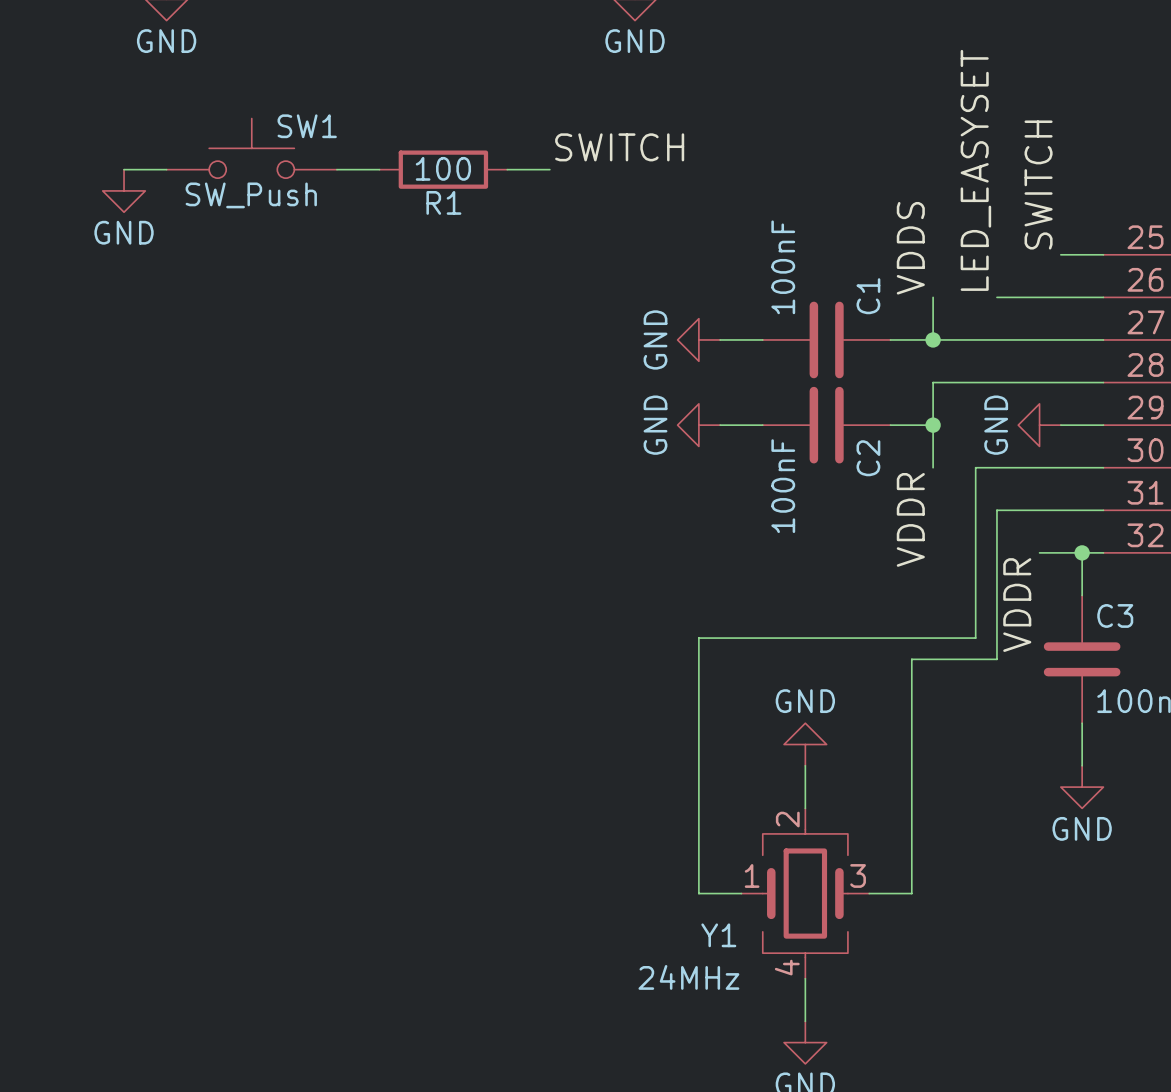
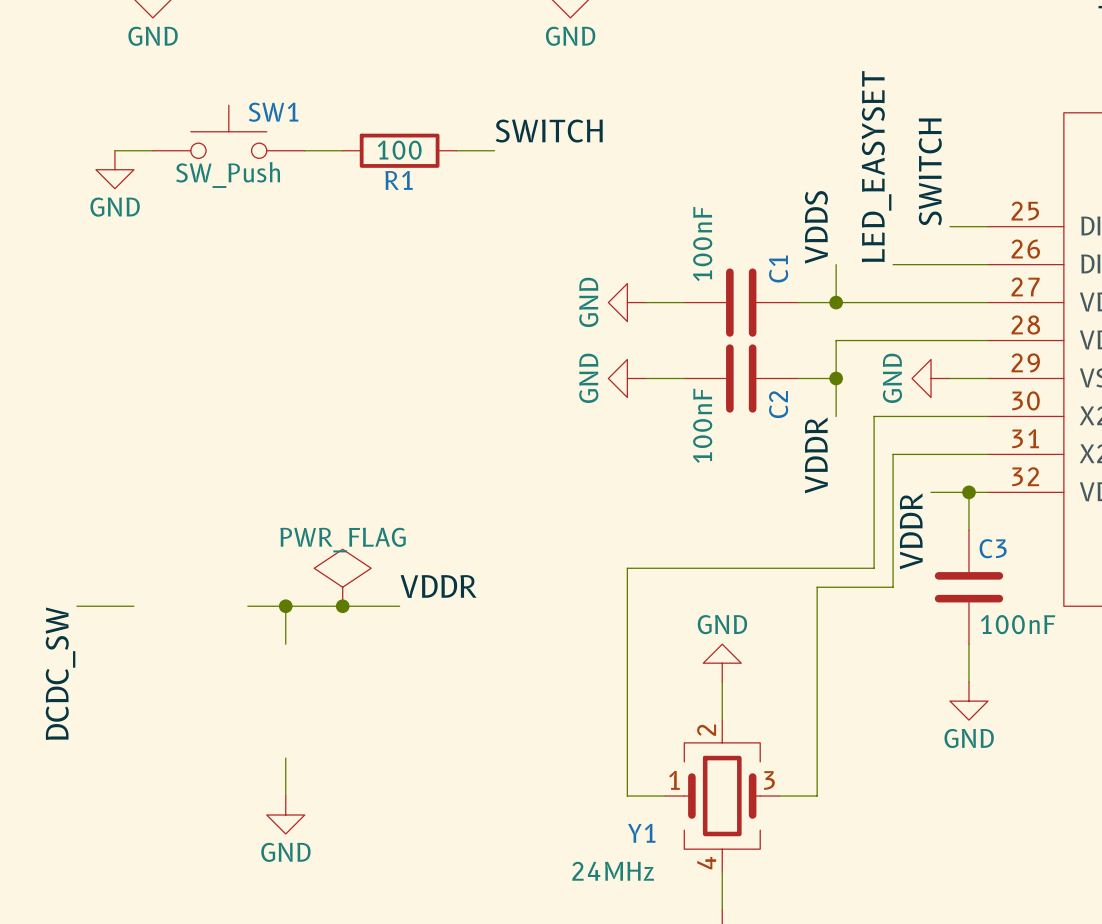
power symbol: none -> PWR_FLAG (342, 577)
label: none -> VDDR (438, 586)
wire: none -> (76, 606) (133, 606)
wire: none -> (247, 606) (399, 606)
wire: none -> (285, 606) (285, 644)
junction: none -> (285, 606)
junction: none -> (342, 606)
label: none -> DCDC_SW (60, 673)
wire: none -> (285, 758) (285, 796)
power symbol: none -> GND (285, 815)

